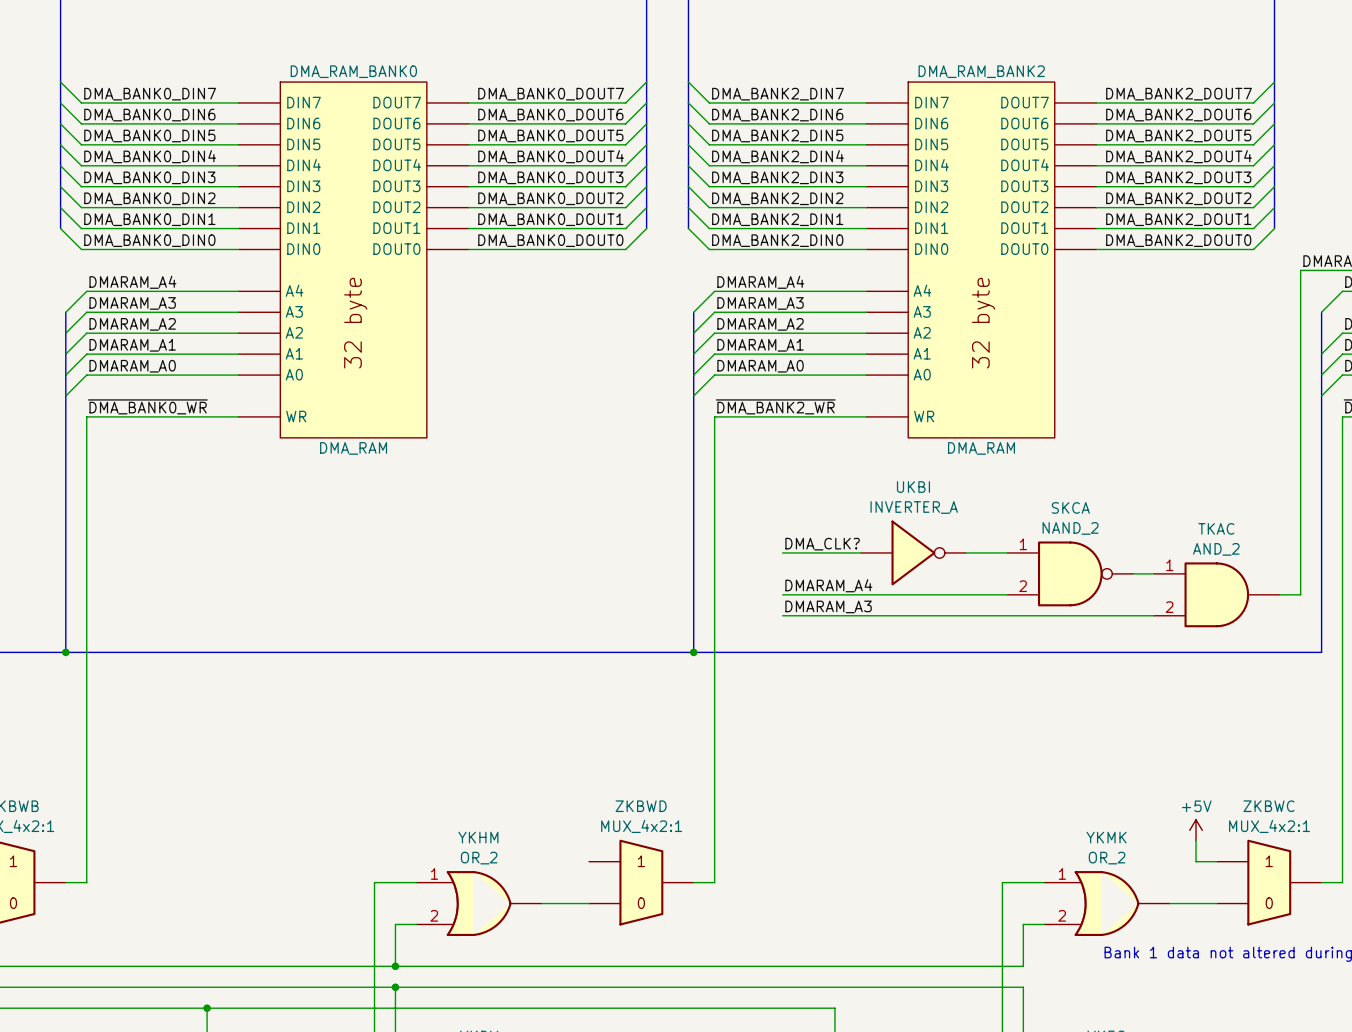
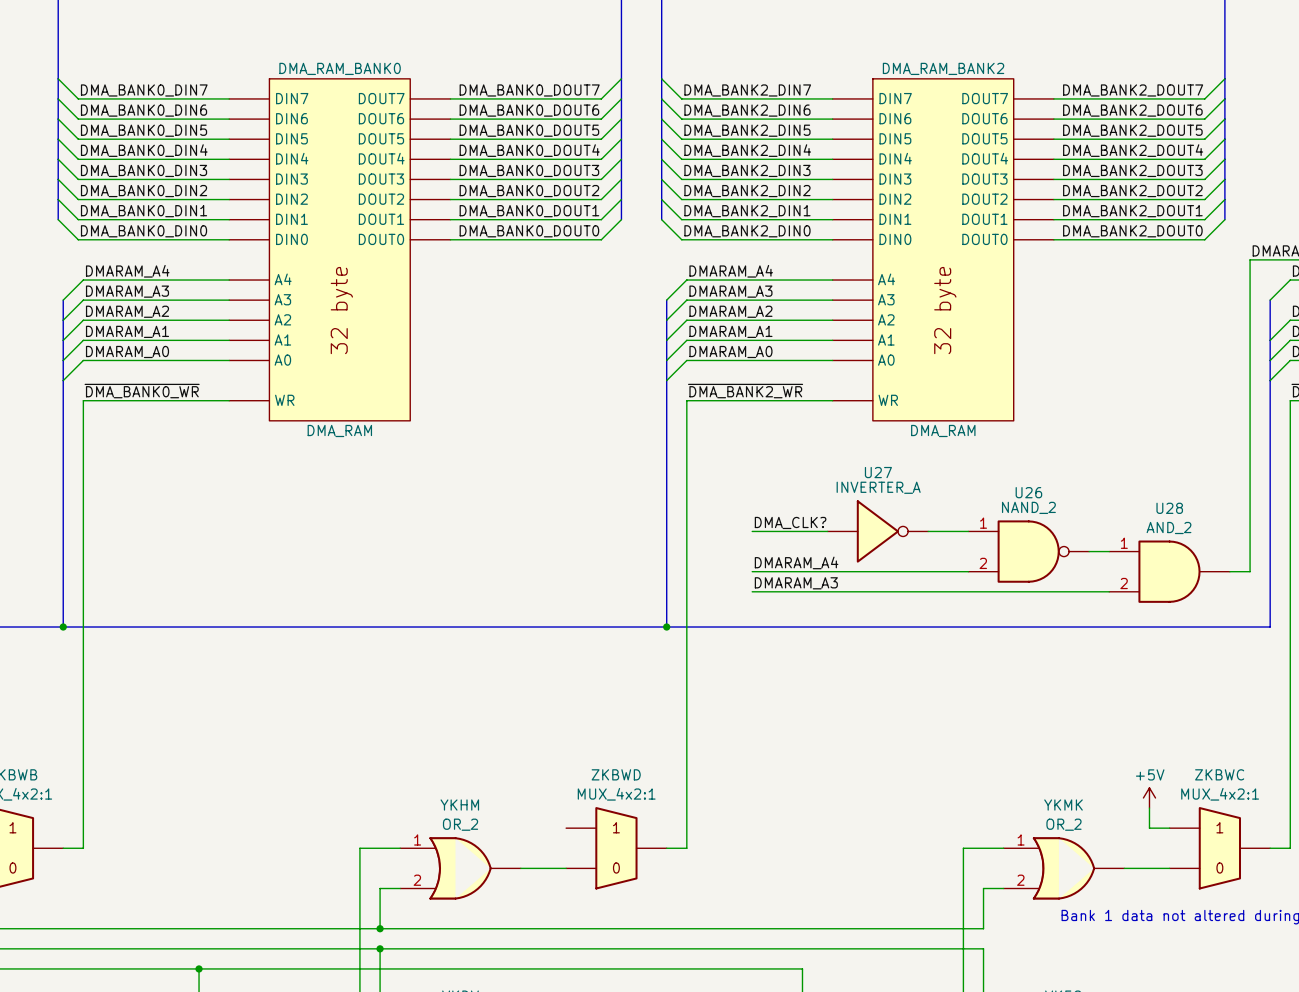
UKBI name: UKBI (913, 487) -> U27 (878, 472)
SKCA name: SKCA (1070, 507) -> U26 (1028, 492)
TKAC name: TKAC (1216, 528) -> U28 (1169, 508)

